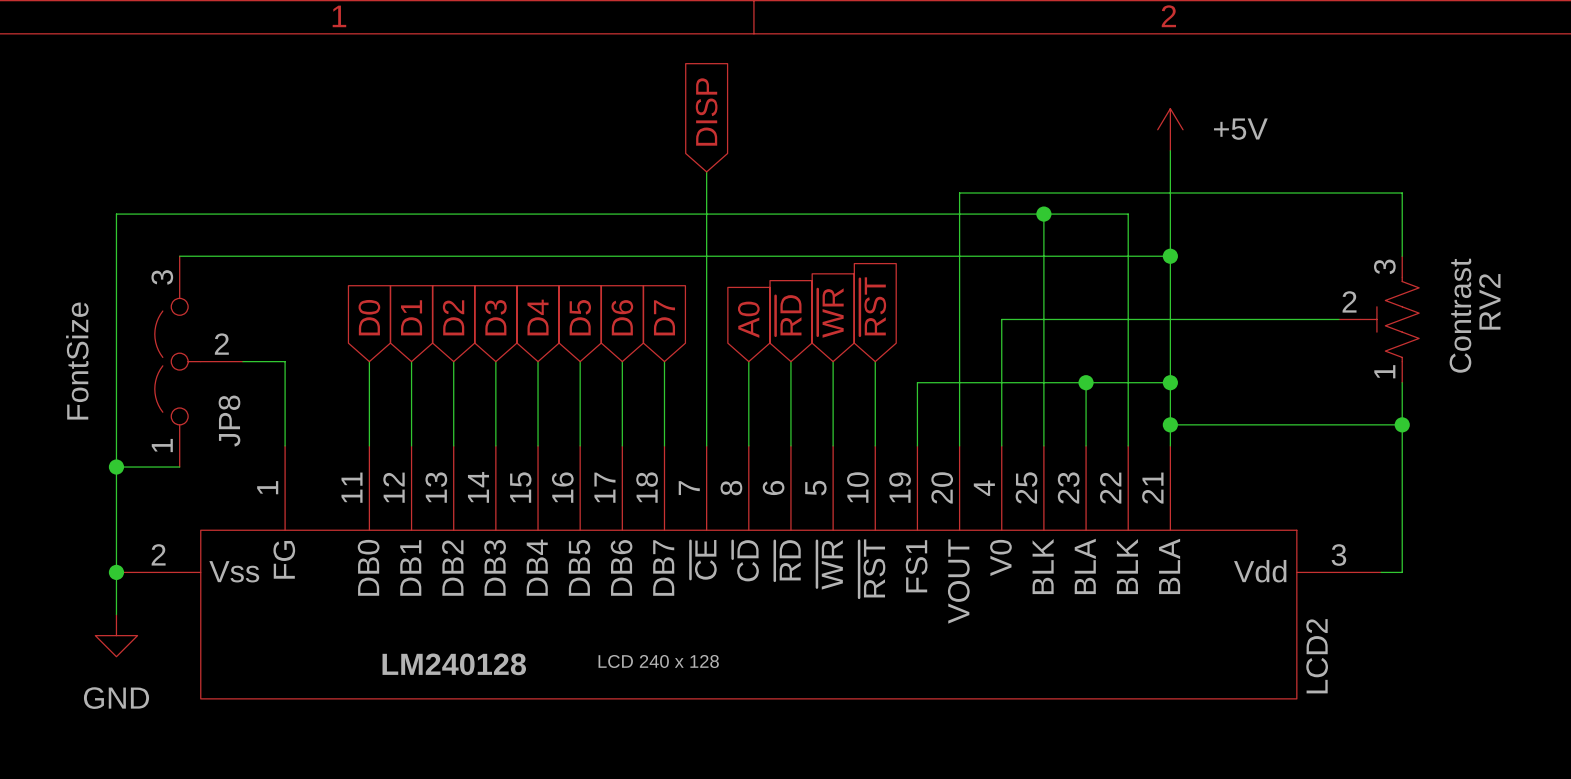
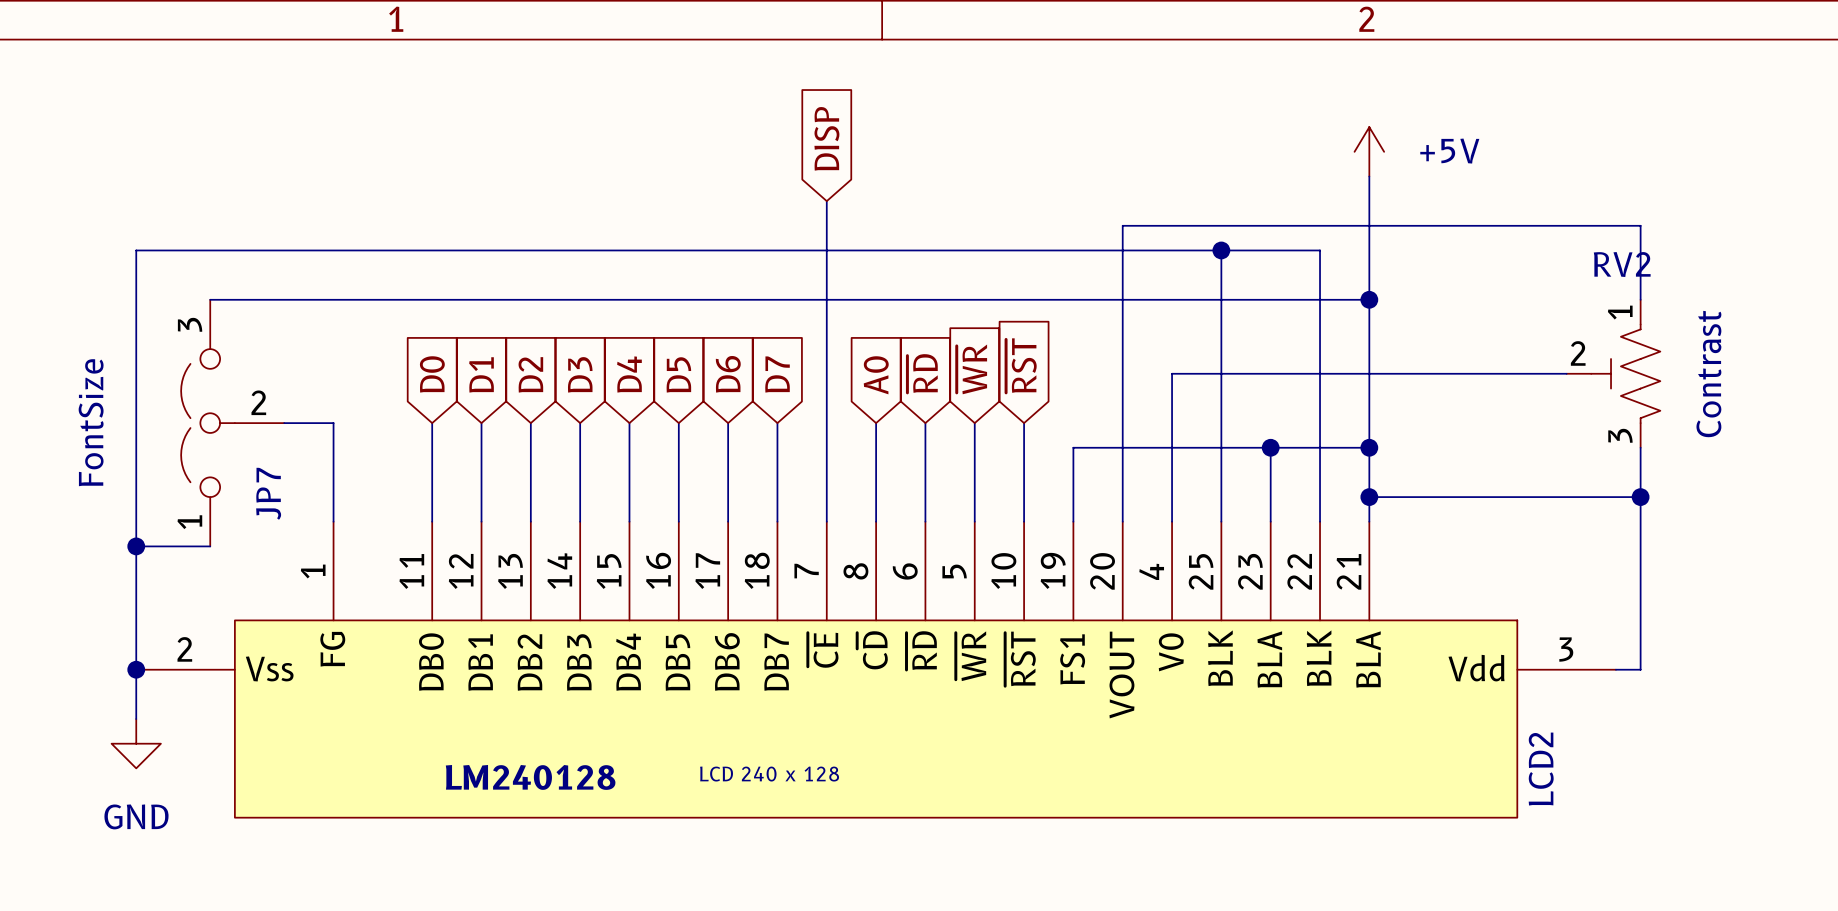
RV2 name position: RV2 (1489, 301) -> RV2 (1622, 264)
RV2 flip: as is (1389, 319) -> up-down (1625, 373)
JP8 name: JP8 (229, 421) -> JP7 (268, 493)

